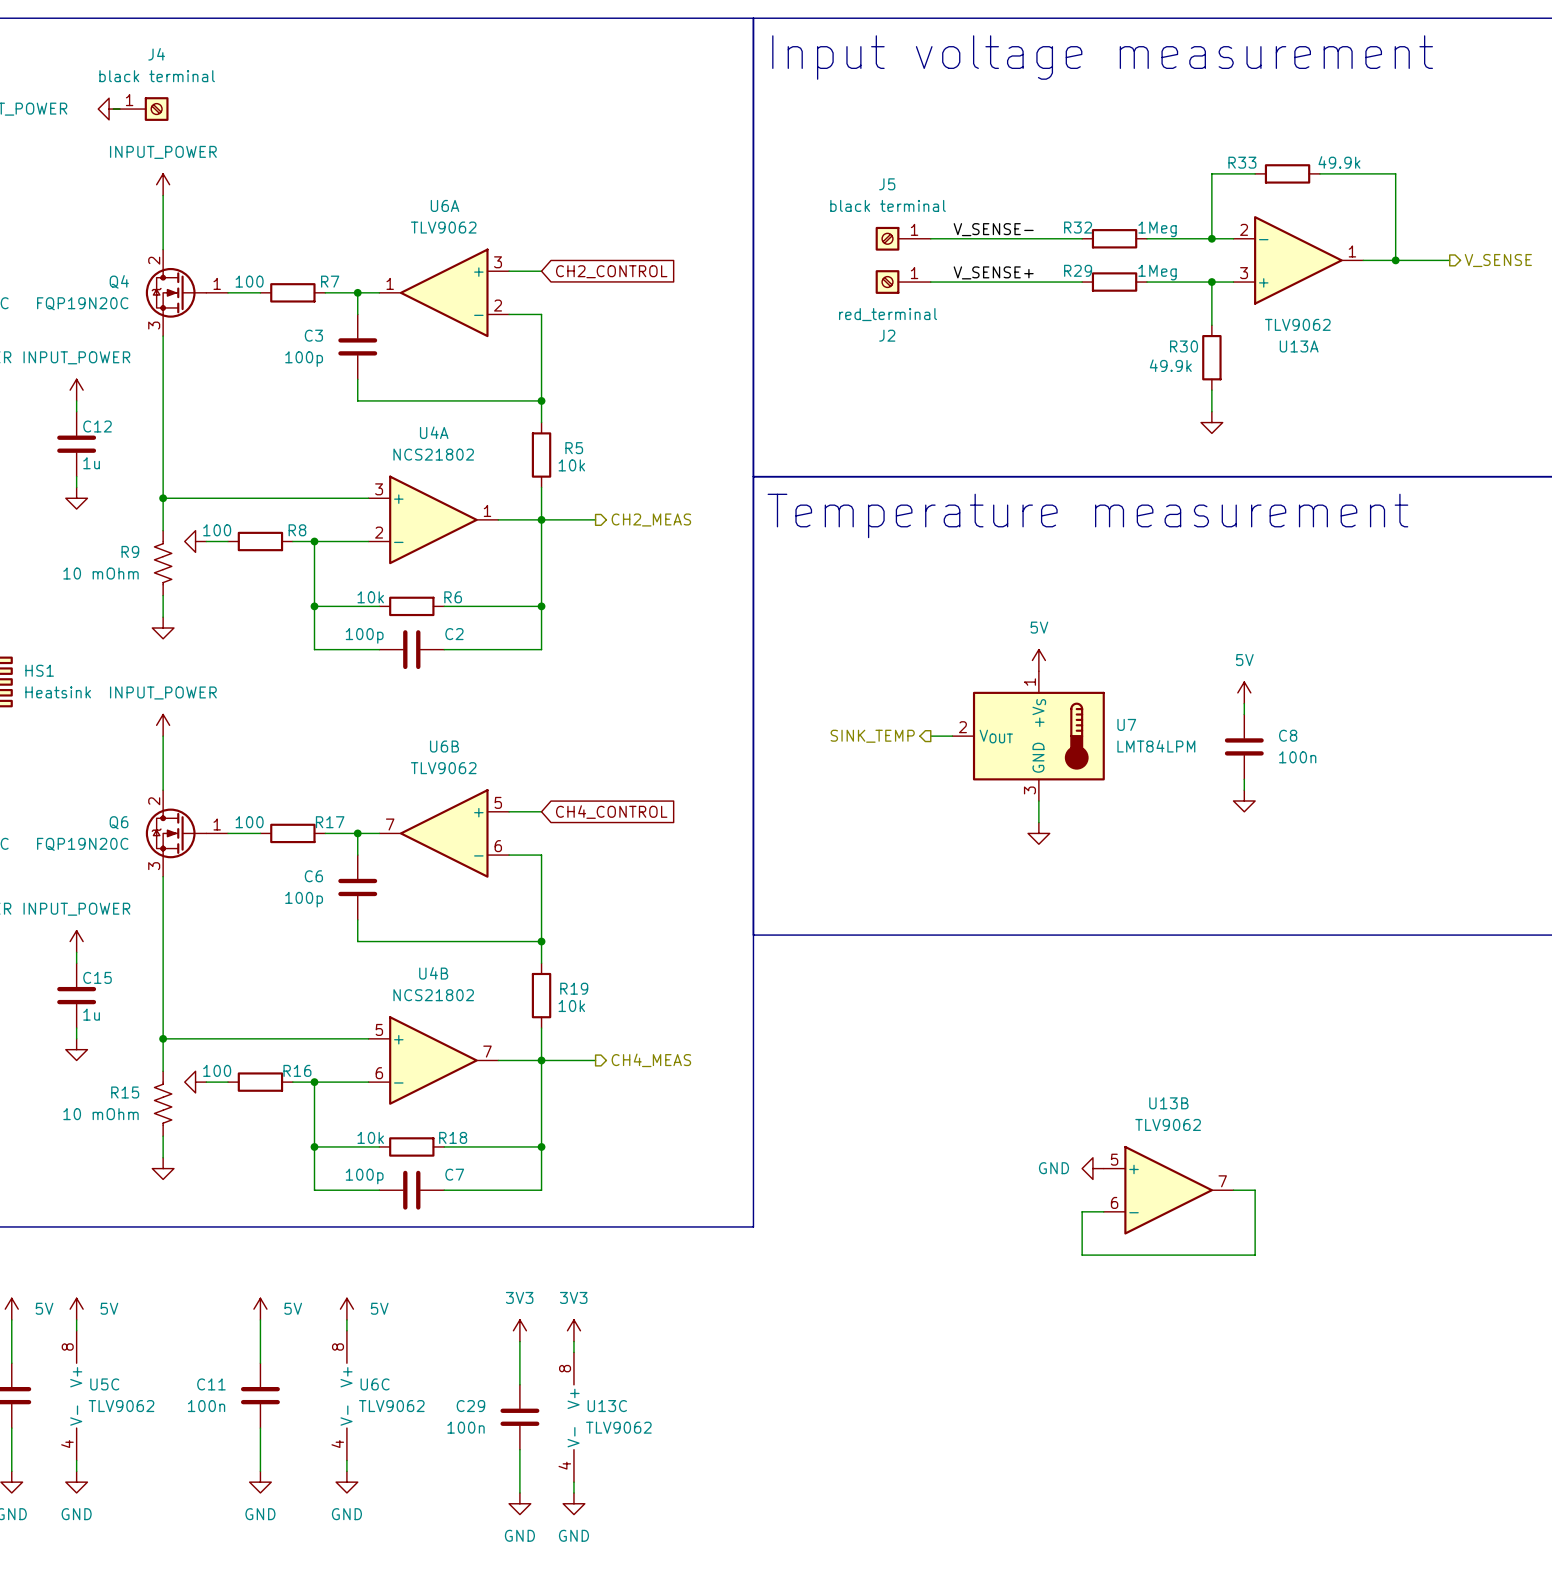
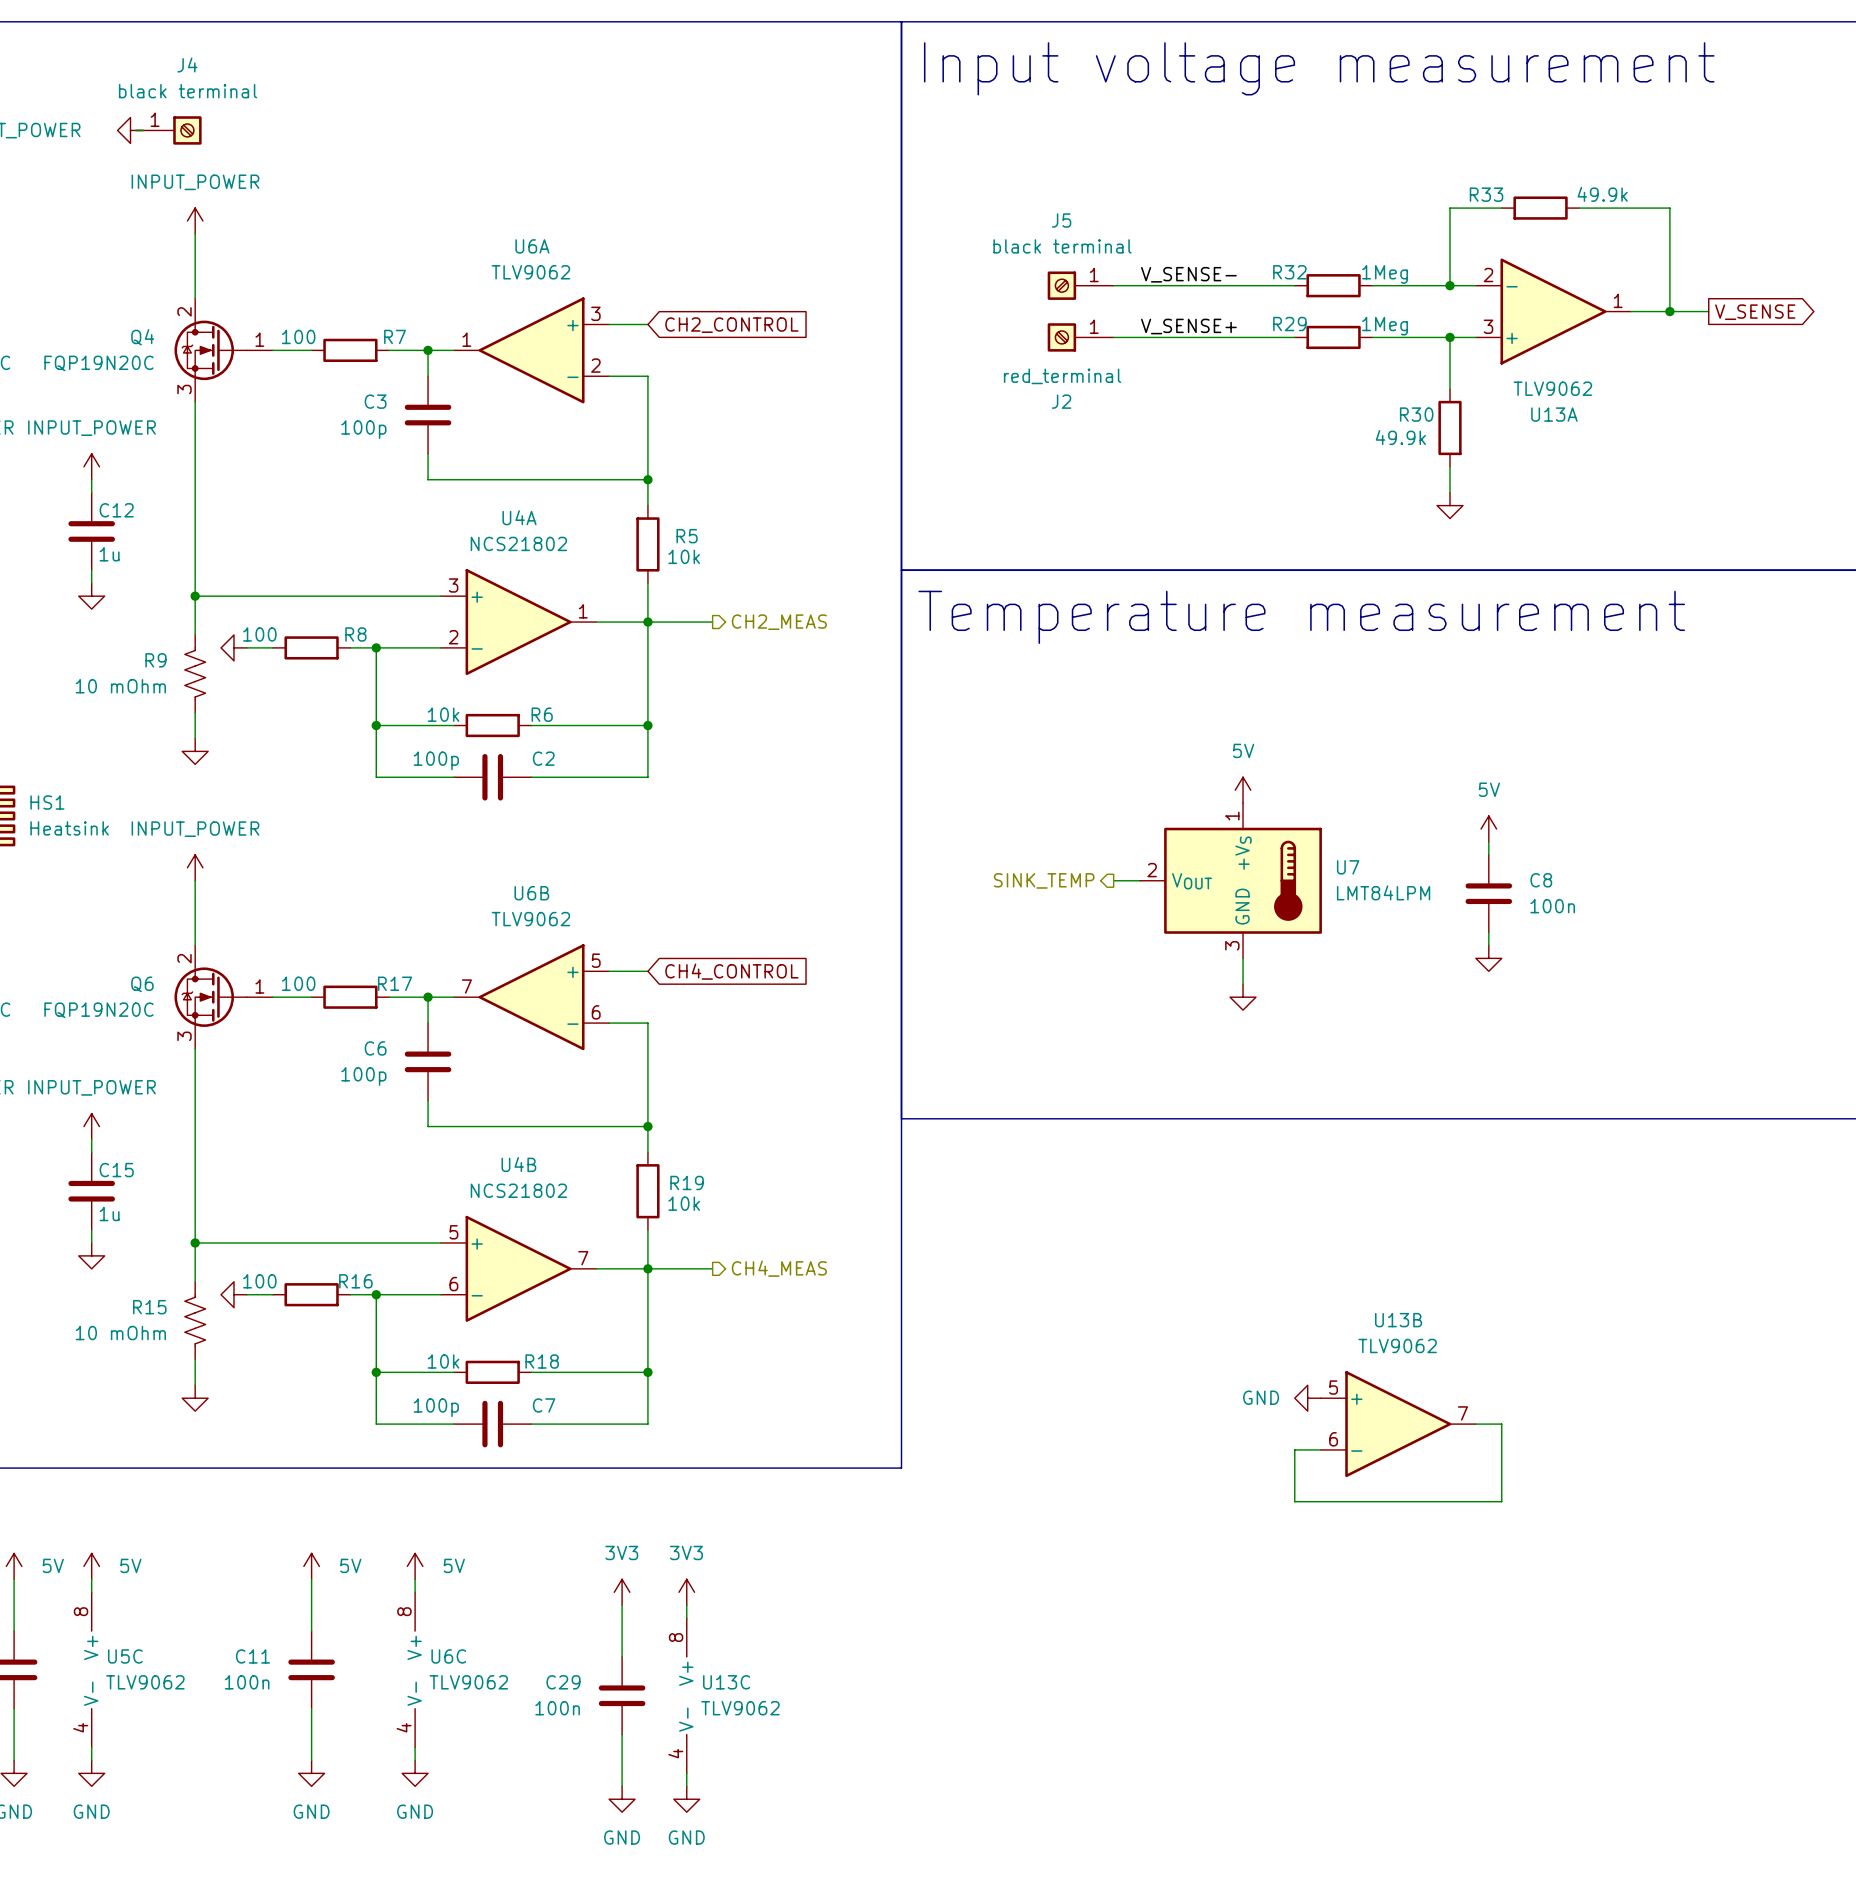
wire: (1428, 260) (1449, 260) -> none
global label: none -> V_SENSE (1755, 312)
hierarchical label: V_SENSE (1498, 260) -> none

